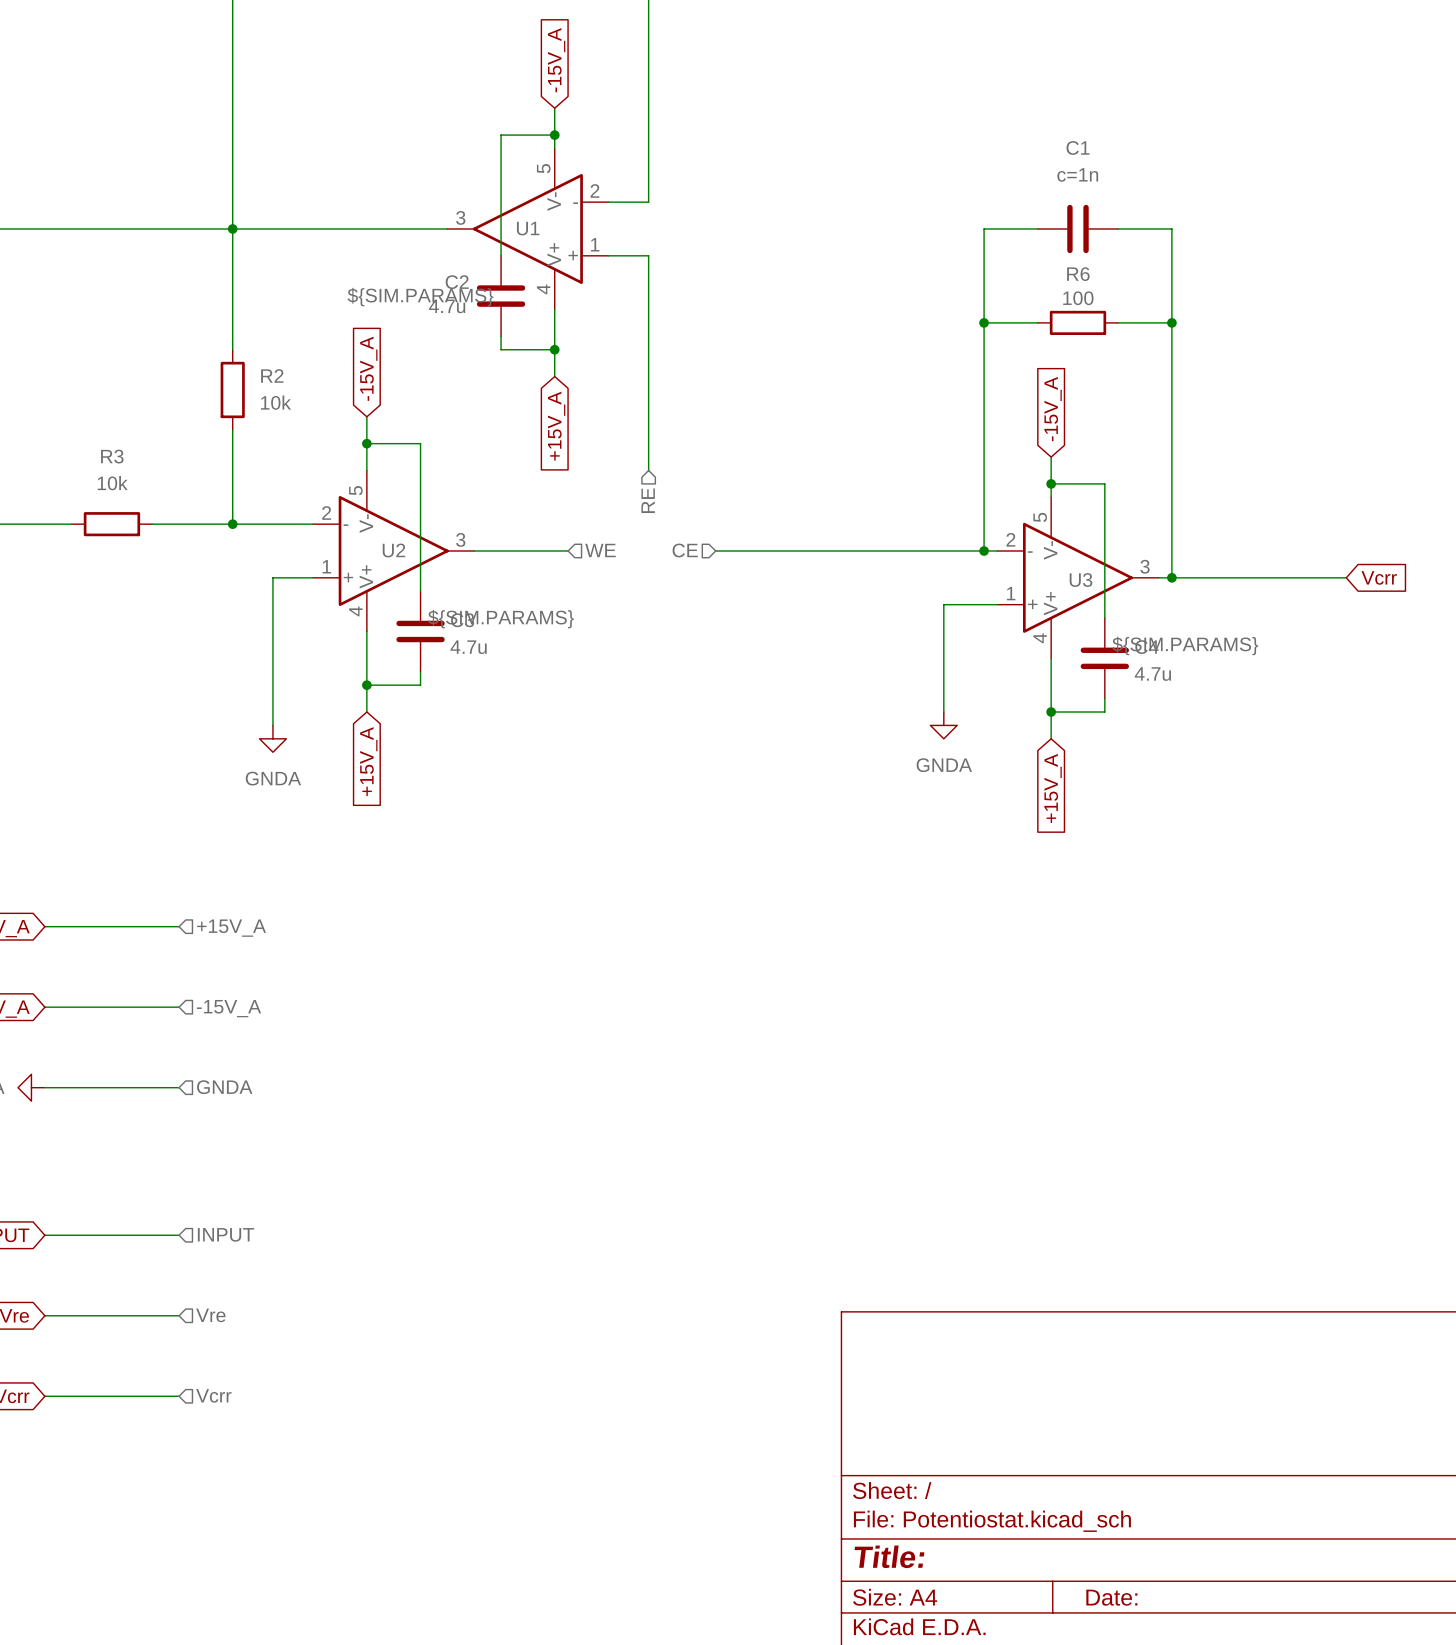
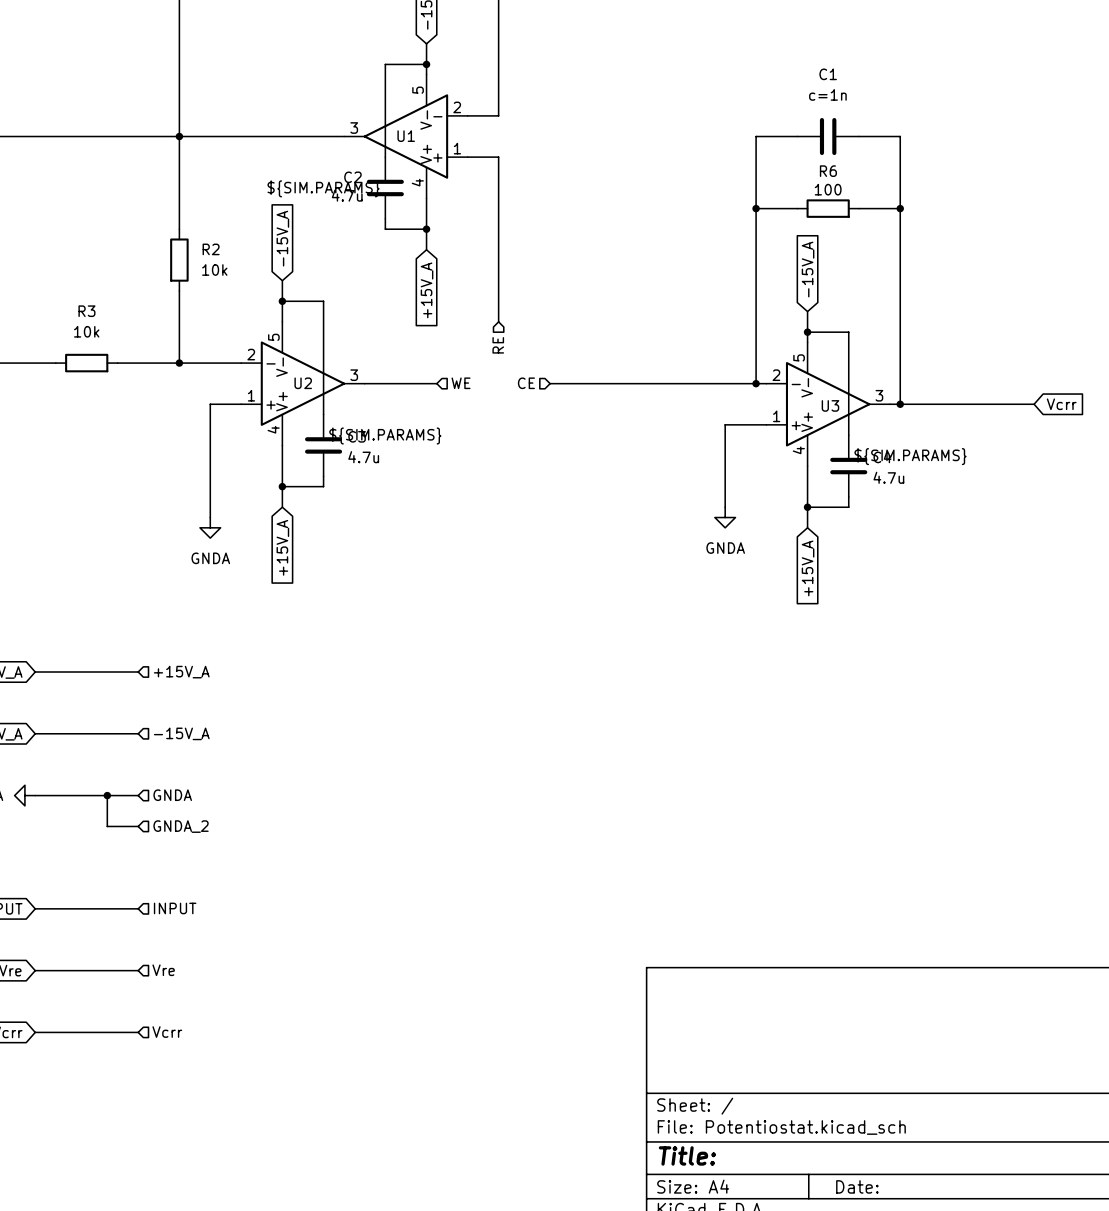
wire: none -> (107, 795) (107, 826) (138, 826)
junction: none -> (107, 795)
hierarchical label: none -> GNDA_2 (181, 826)

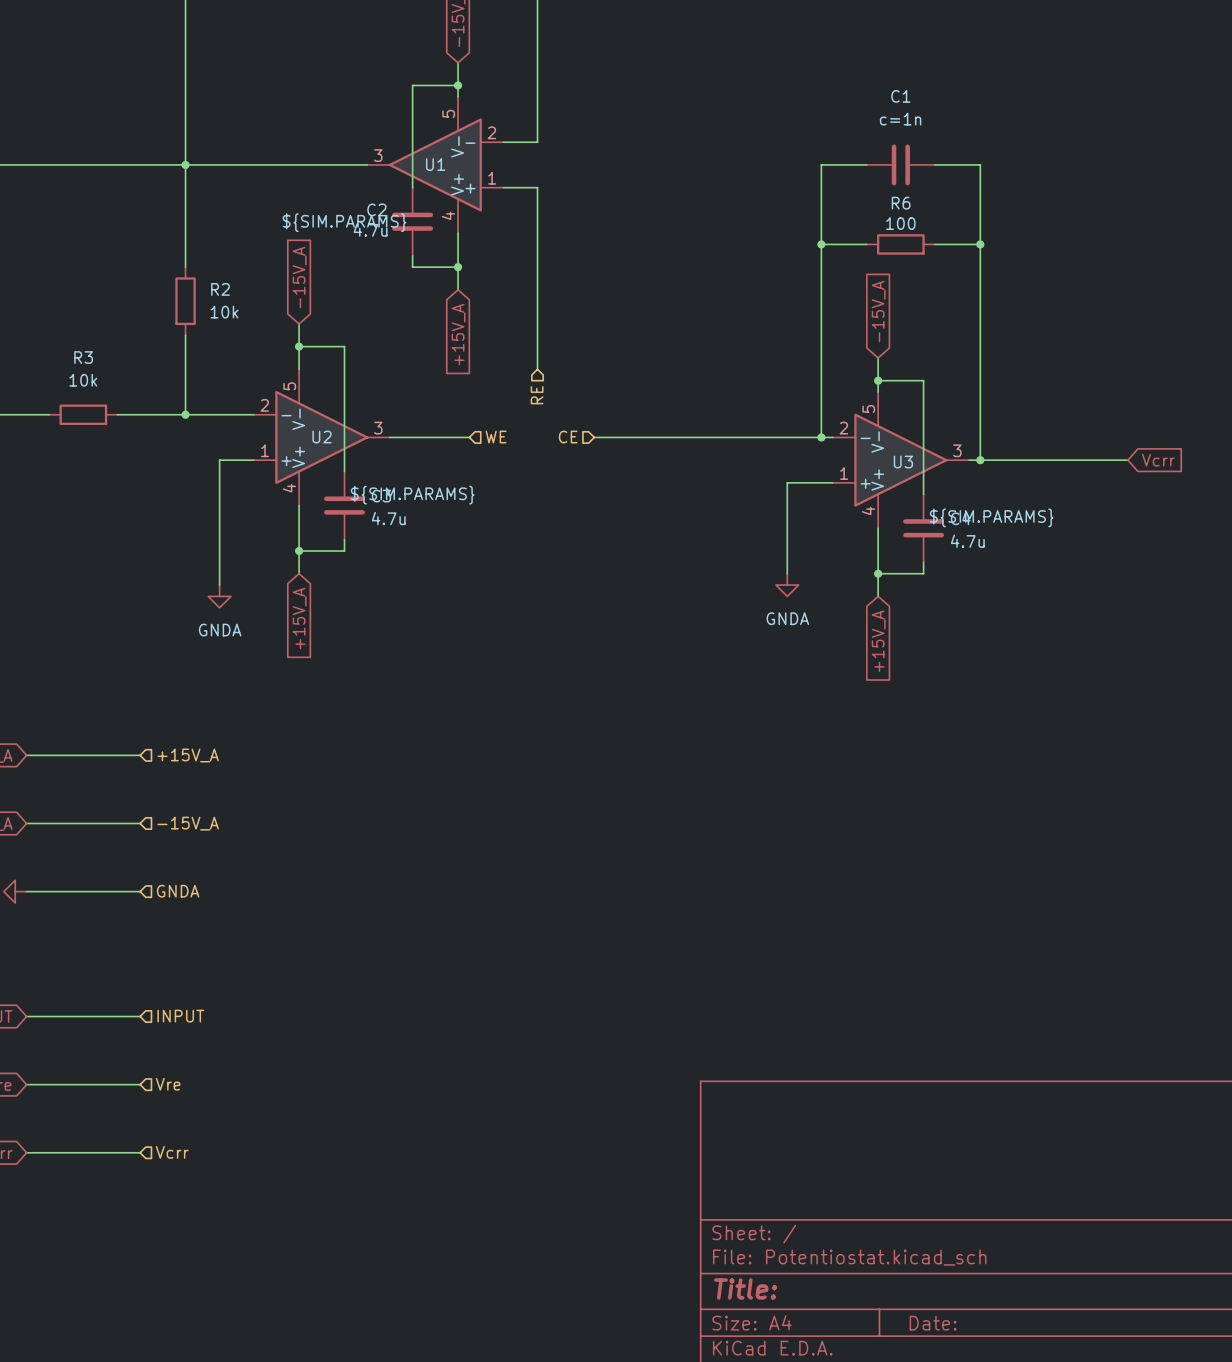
wire: (107, 795) (107, 826) (138, 826) -> none
junction: (107, 795) -> none
hierarchical label: GNDA_2 (181, 826) -> none

